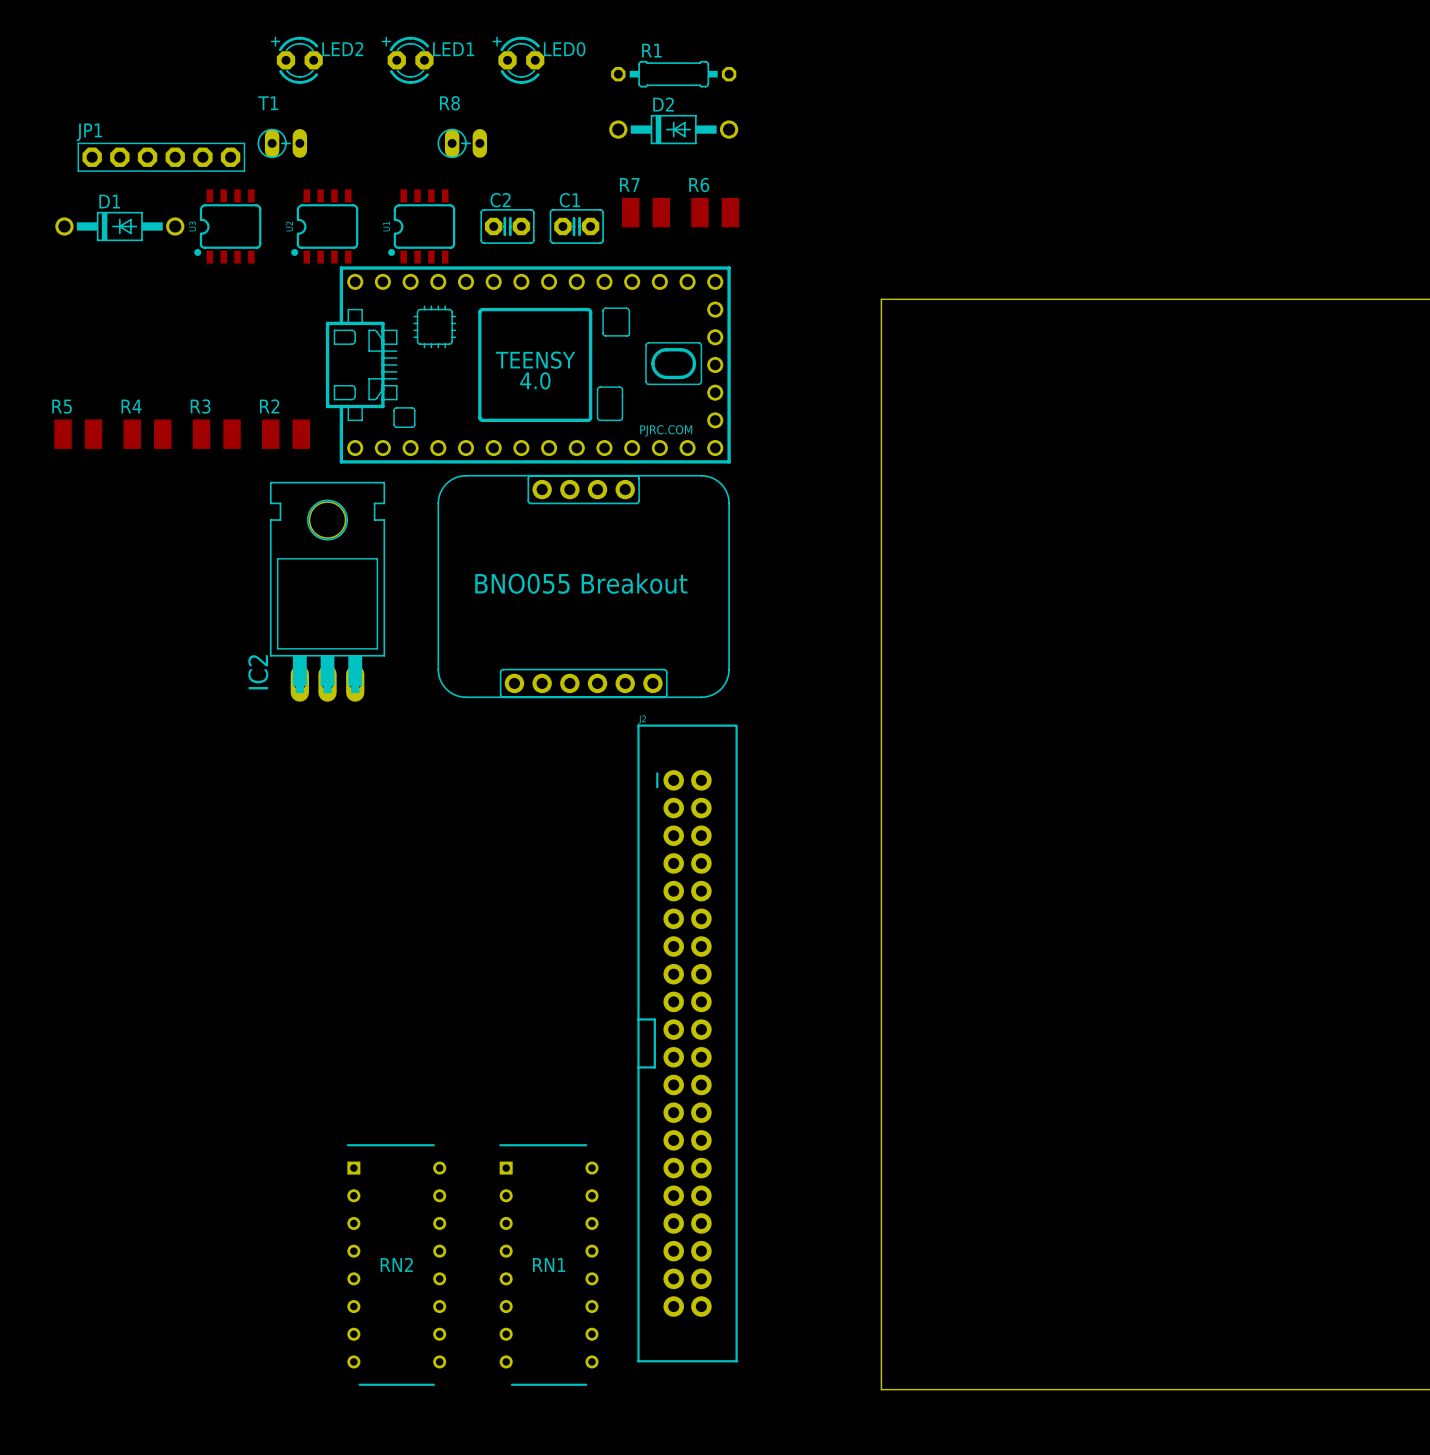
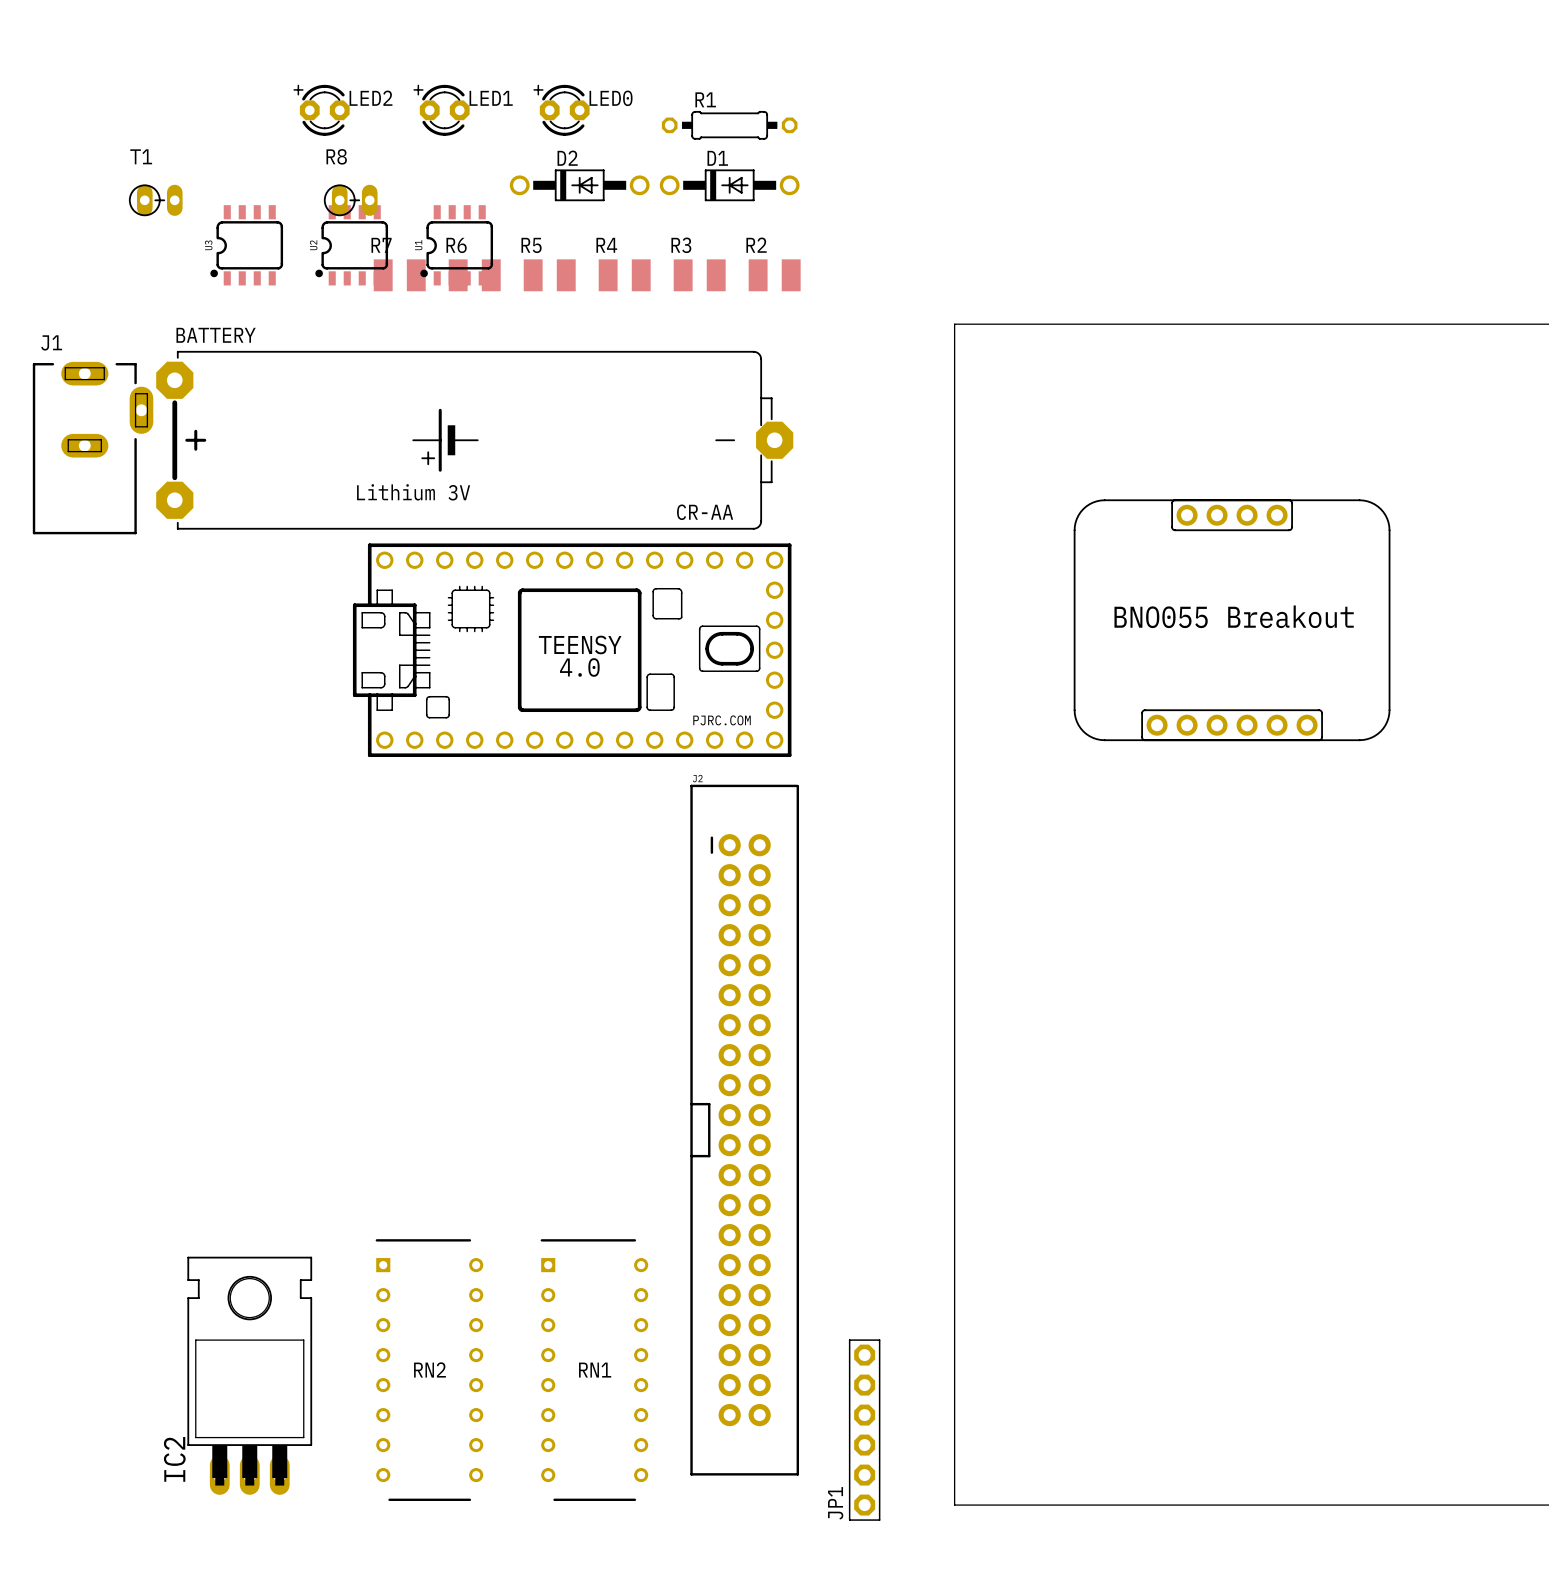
LED2 position: (296, 60) -> (321, 110)
LED1 position: (407, 60) -> (441, 110)
LED0 position: (518, 60) -> (561, 110)
R1 position: (673, 74) -> (729, 125)
D2 position: (673, 129) -> (579, 185)
JP1 name position: JP1 (89, 132) -> JP1 (835, 1503)
T1 position: (282, 143) -> (155, 200)
R8 position: (462, 143) -> (350, 200)
JP1 rotation: 0° (161, 157) -> 90° clockwise (864, 1430)
JP1 position: (161, 157) -> (864, 1430)
R7 position: (646, 212) -> (399, 275)
R6 position: (715, 212) -> (474, 275)
D1 position: (119, 226) -> (729, 185)
C2: (507, 226) -> none
C1: (576, 226) -> none
part position: (528, 364) -> (572, 650)
BATTERY: none -> (474, 440)
J1: none -> (93, 448)
R5 position: (78, 434) -> (549, 275)
R4 position: (147, 434) -> (624, 275)
R3 position: (216, 434) -> (699, 275)
R2 position: (285, 434) -> (774, 275)
part: none -> (1232, 620)
part: (583, 586) -> none
IC2 position: (327, 591) -> (249, 1375)

